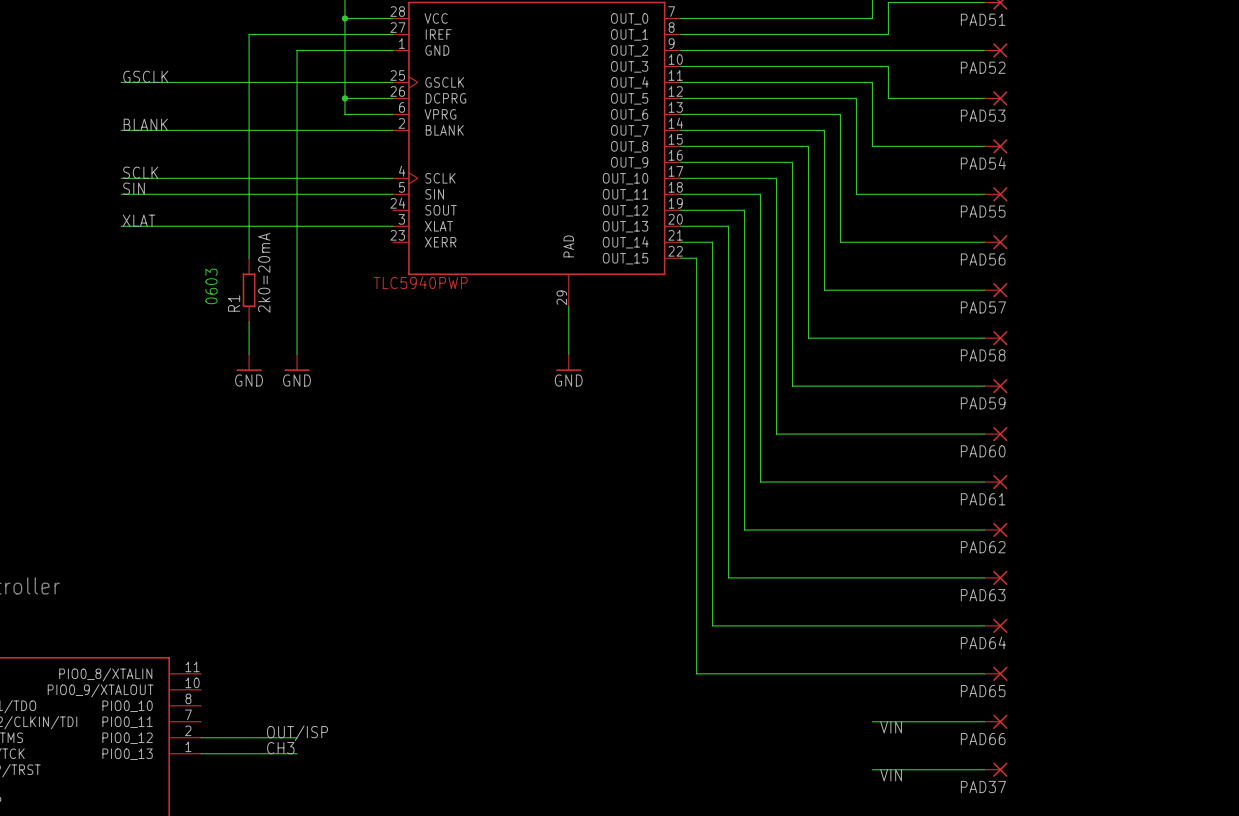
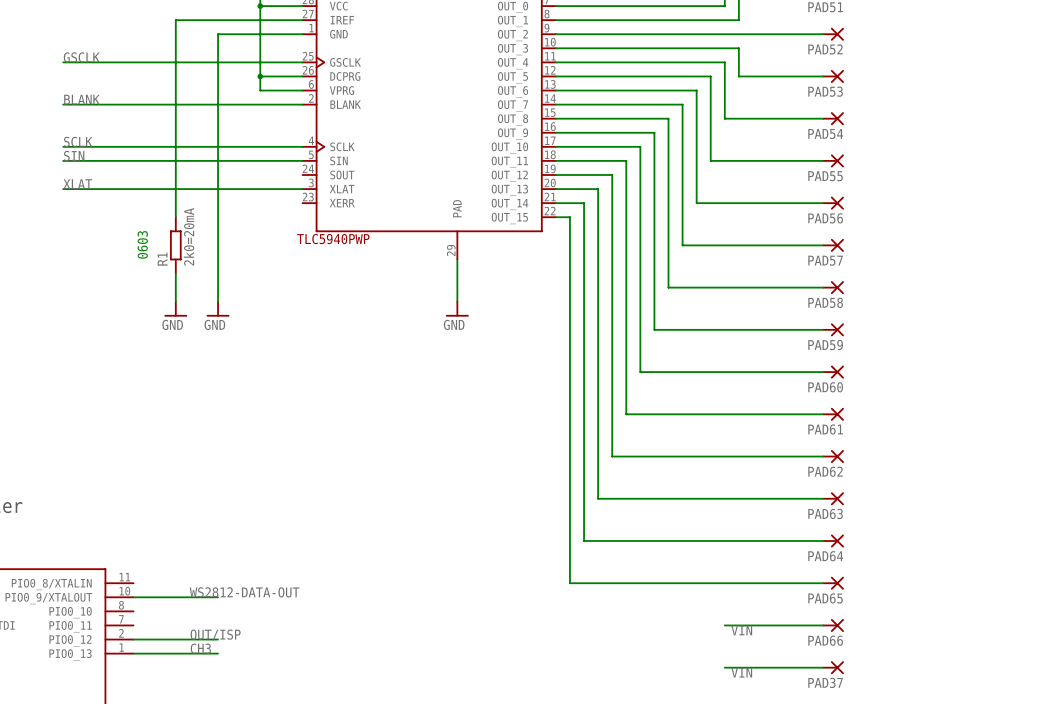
label: none -> WS2812-DATA-OUT (244, 592)
wire: none -> (133, 597) (218, 597)

